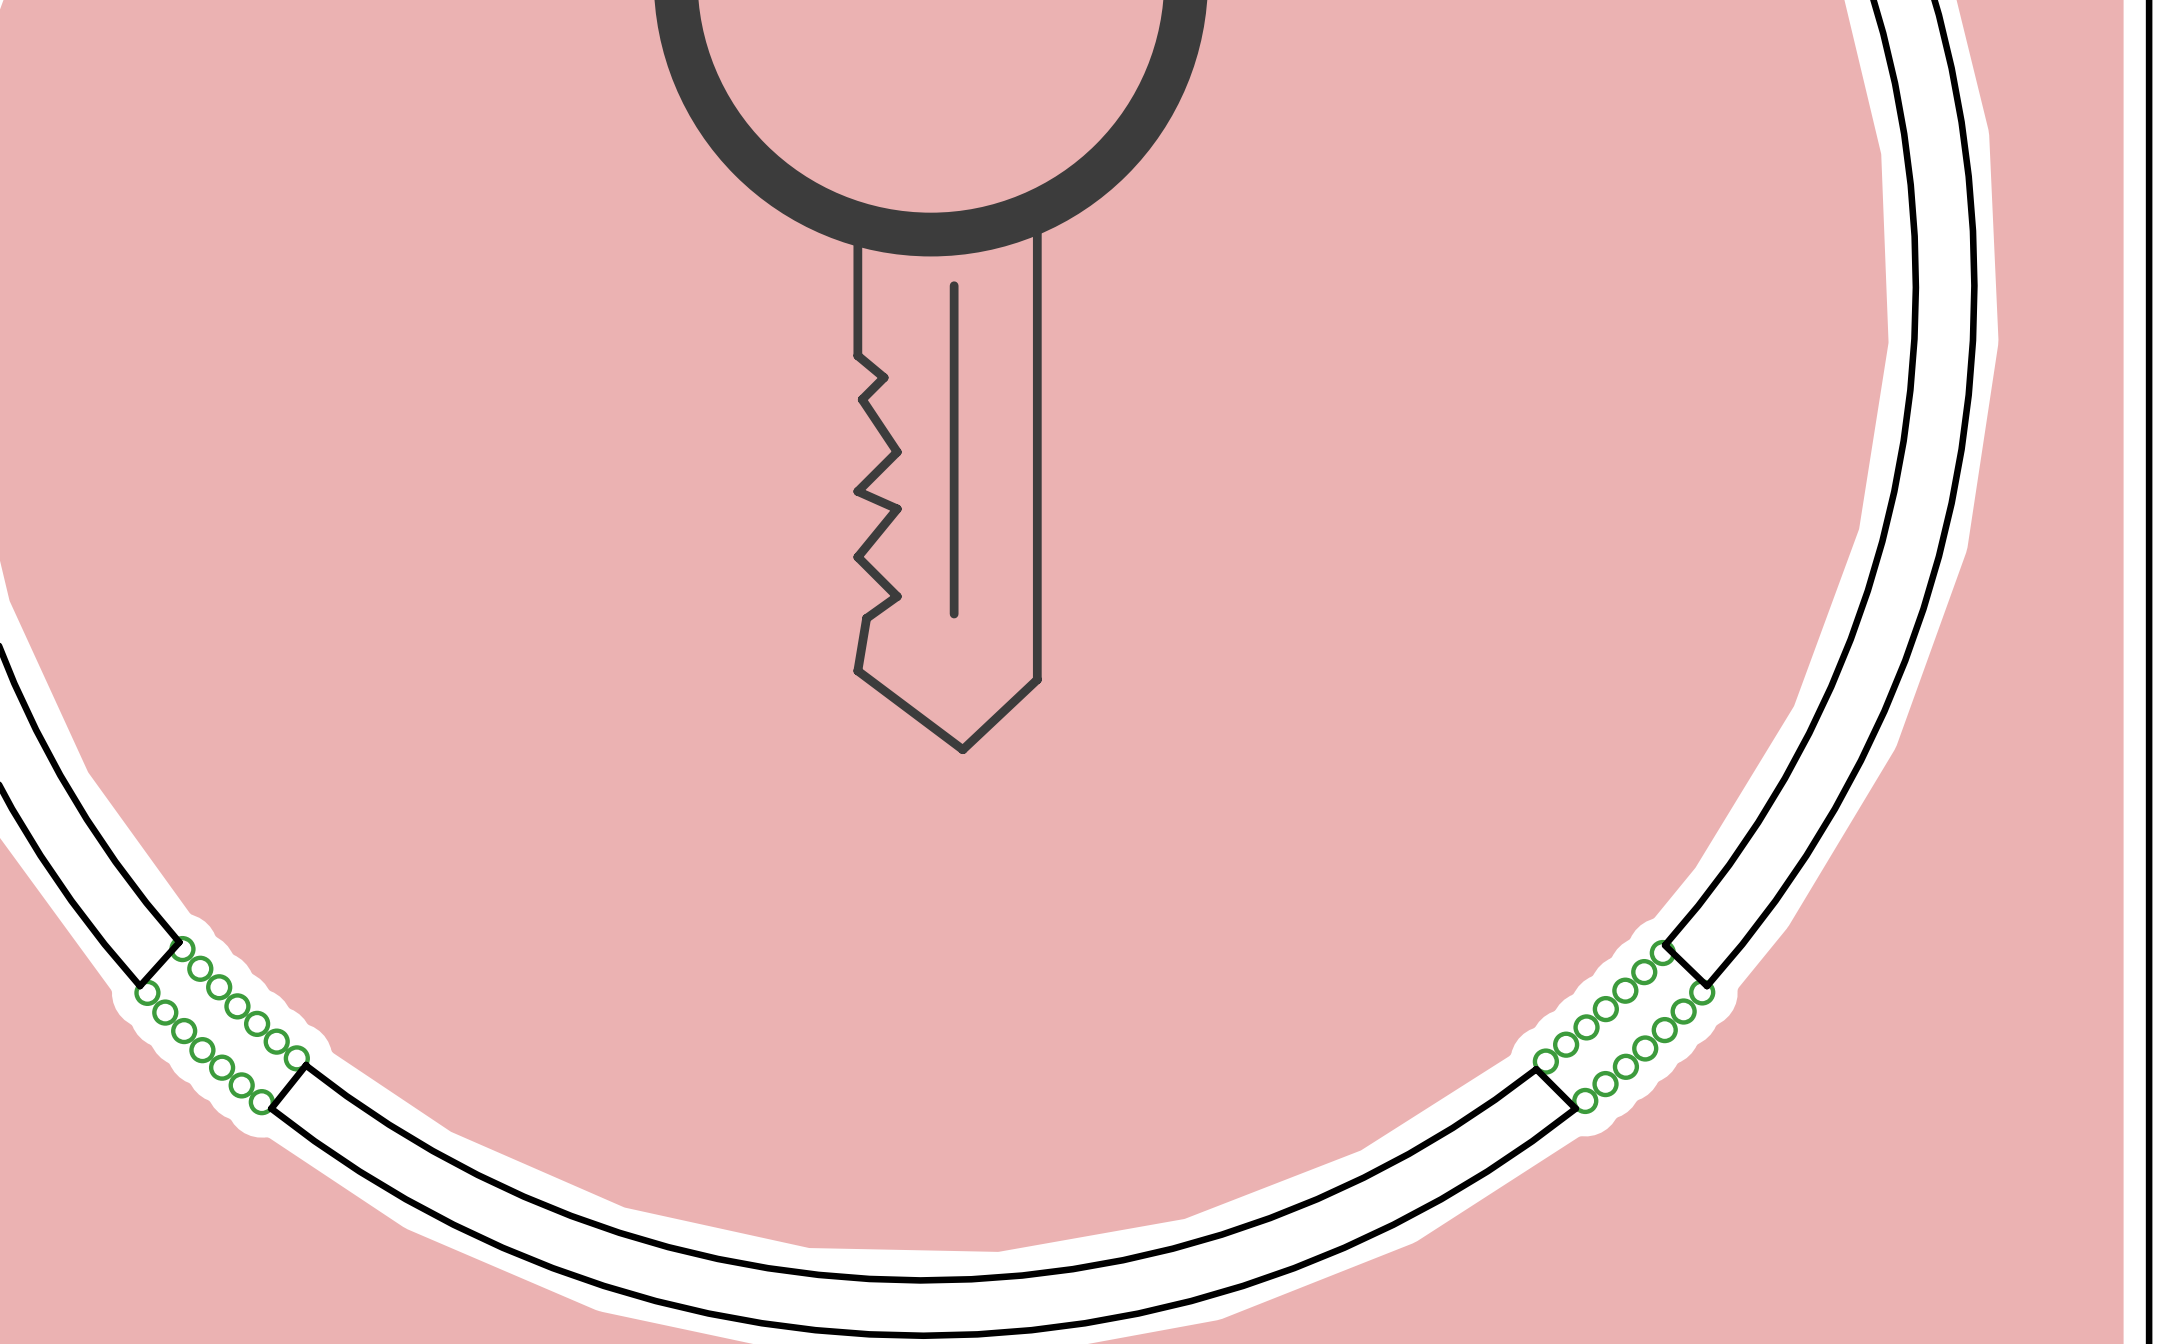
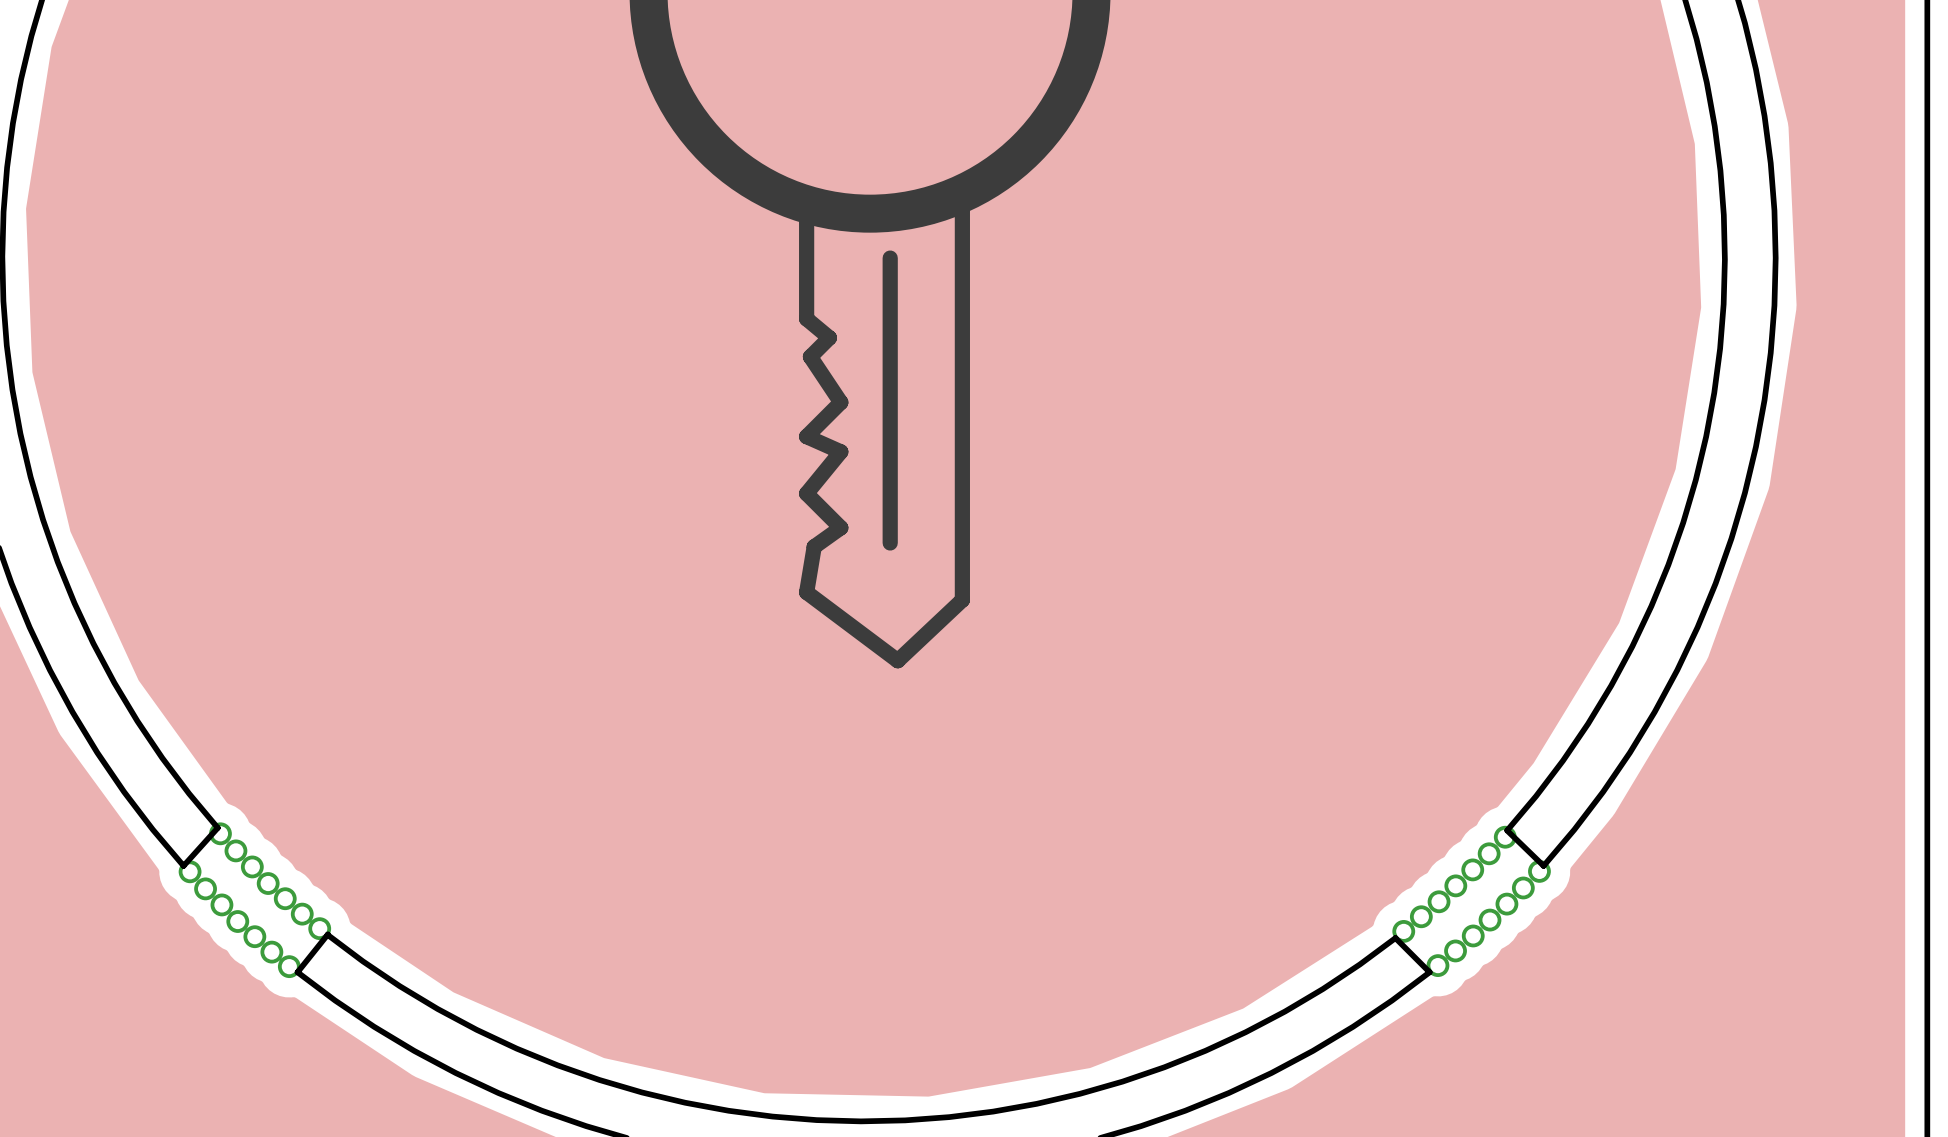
line width: thin (1037, 211) (1037, 679) (962, 749) (857, 670) (866, 618) (897, 596) (857, 557) (897, 508) (857, 491) (897, 452) (862, 399) (884, 377) (857, 355) (857, 228) -> thick (962, 193) (962, 599) (897, 660) (806, 592) (814, 546) (840, 527) (806, 493) (840, 451) (806, 436) (840, 402) (810, 356) (829, 337) (806, 318) (806, 208)
line width: thin (954, 285) (954, 614) -> thick (890, 258) (890, 542)

